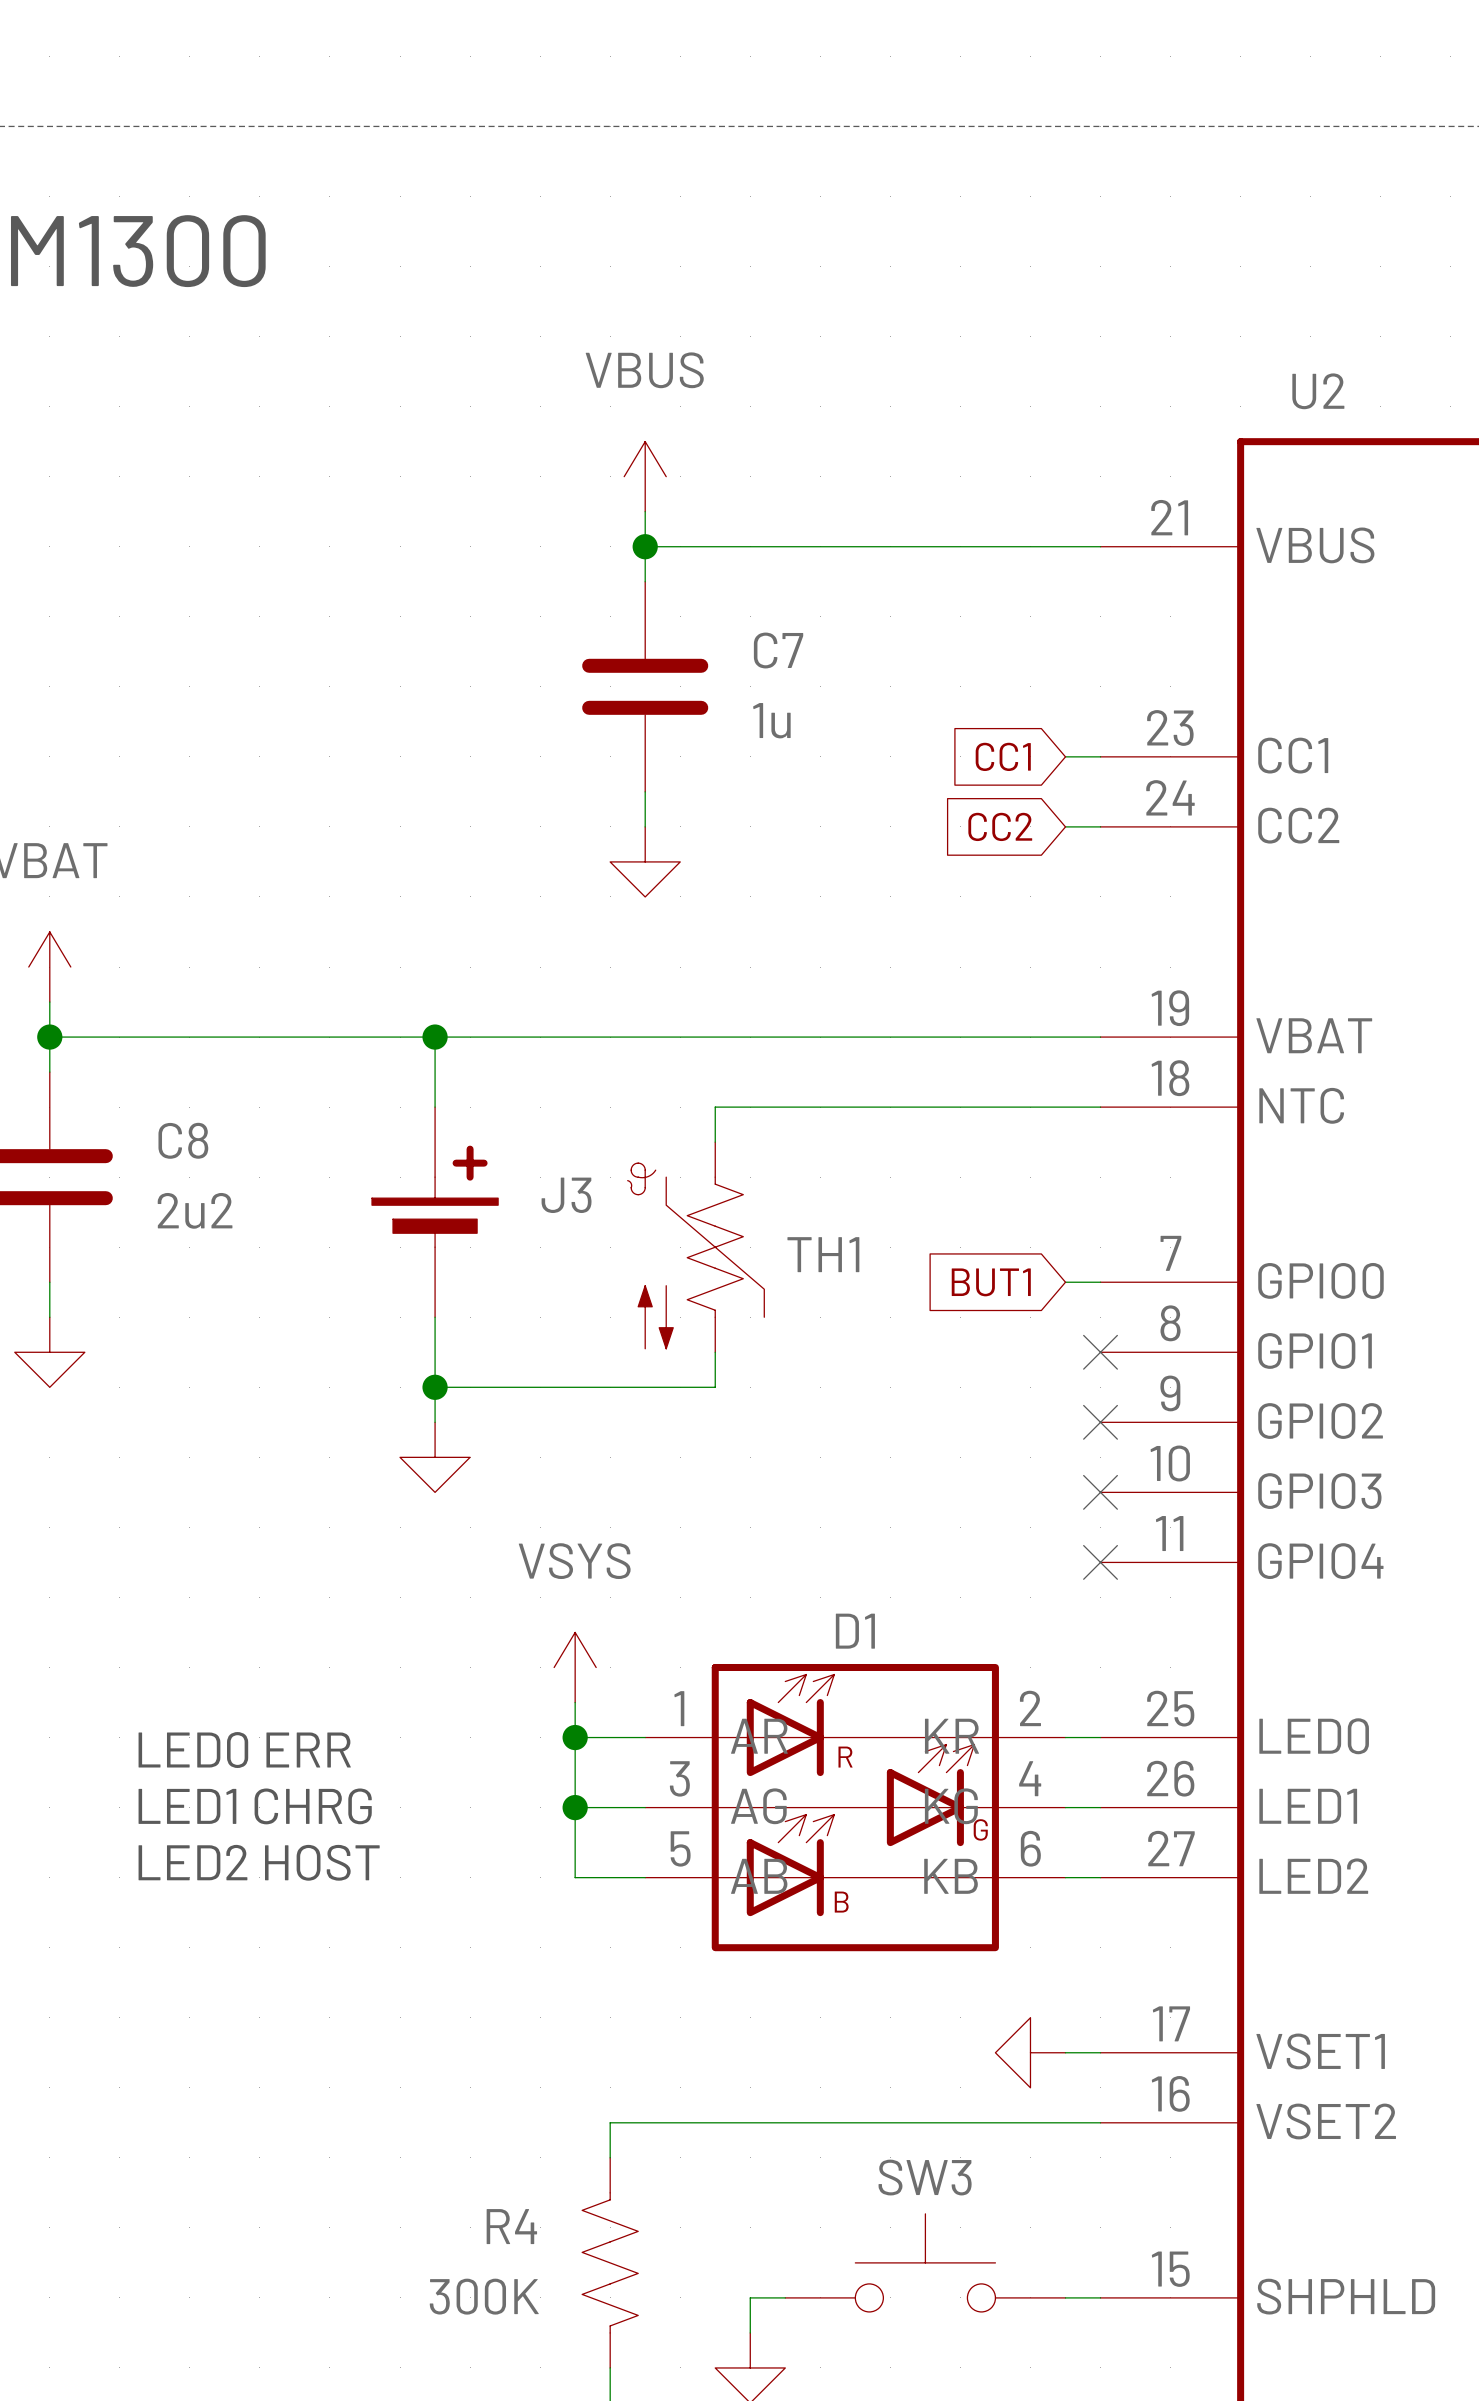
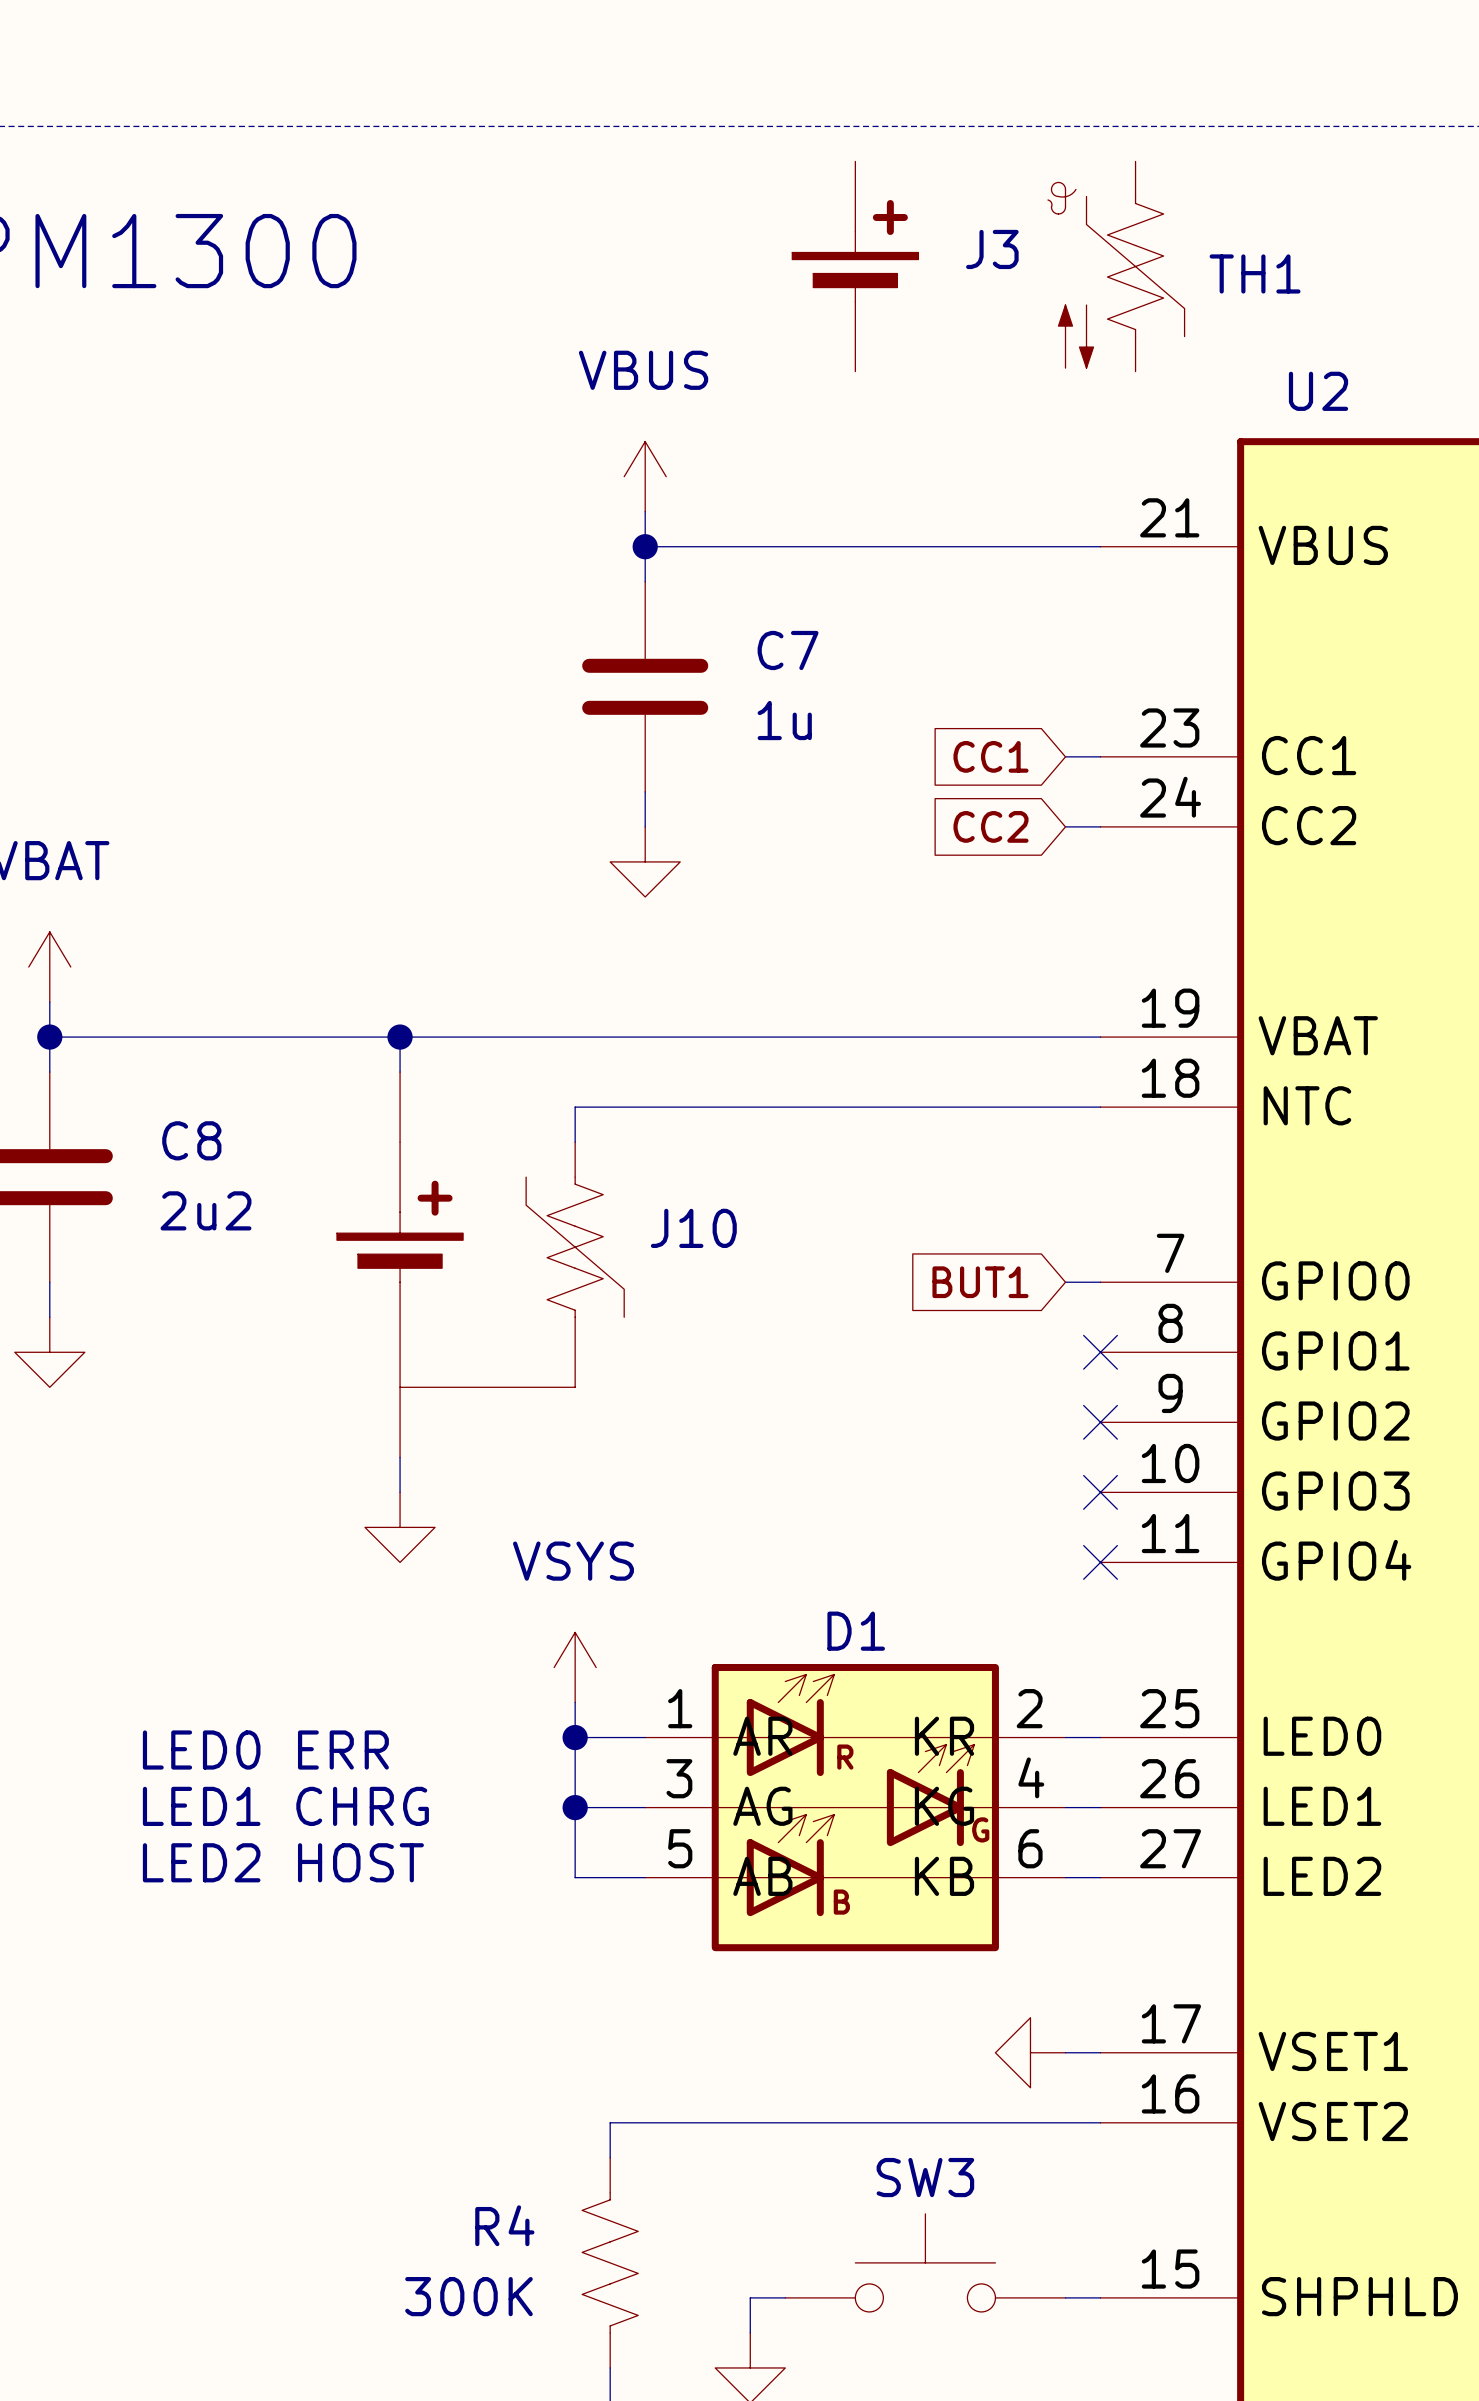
wire: none -> (400, 1037) (400, 1072)
wire: (435, 1037) (435, 1107) -> none
junction position: (435, 1037) -> (400, 1037)
wire: (715, 1107) (715, 1142) -> (715, 1107) (575, 1107) (575, 1142)
J3 position: (435, 1212) -> (855, 266)
TH1 position: (695, 1247) -> (1116, 266)
J10: none -> (480, 1264)
wire: (435, 1317) (435, 1422) -> none
wire: (715, 1352) (715, 1387) (435, 1387) -> none
junction: (435, 1387) -> none
wire: none -> (400, 1457) (400, 1492)
power symbol position: (435, 1457) -> (400, 1527)

